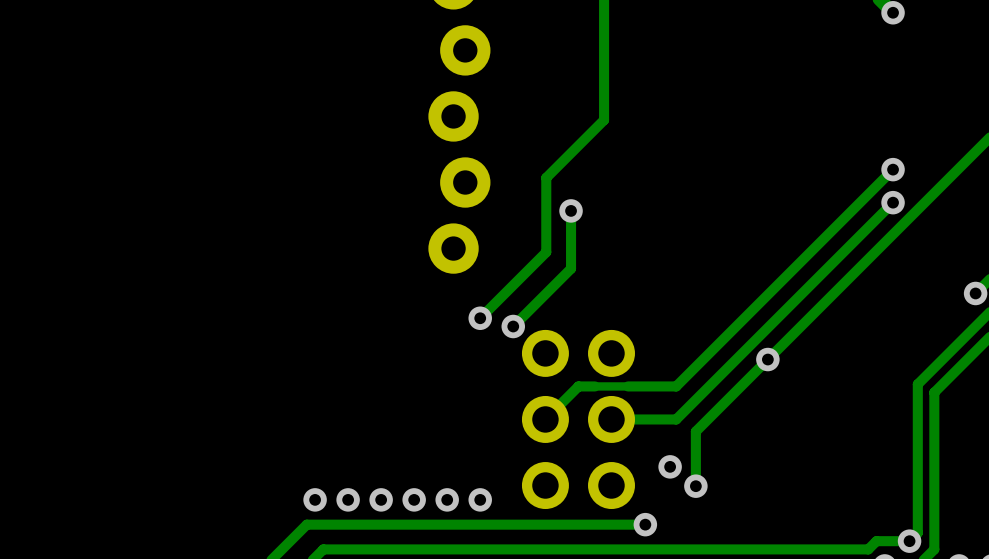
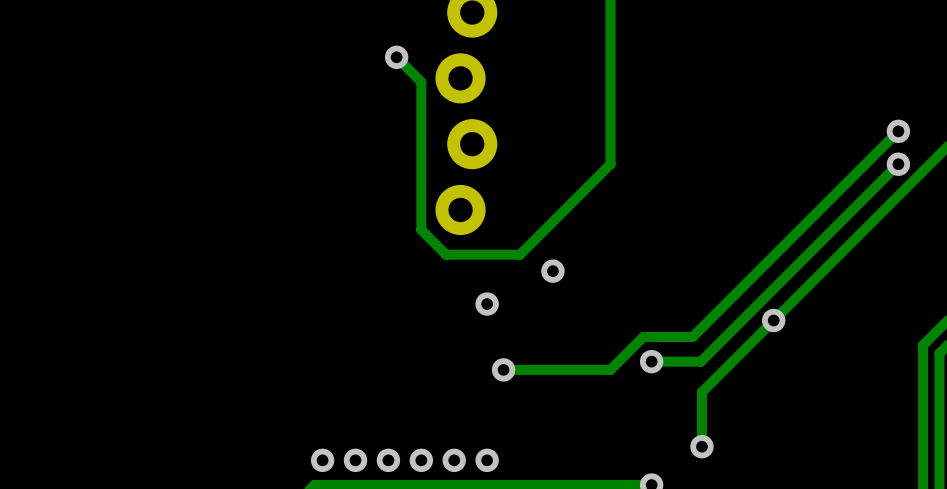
via: none -> (396, 57)
track: (604, 120) (546, 177) (546, 252) (480, 318) -> (610, 81) (610, 164) (520, 254) (445, 254) (421, 230) (421, 81) (396, 57)
track: (571, 210) (571, 268) (513, 326) -> none
via: (571, 210) -> none
via: none -> (552, 271)
via: (480, 318) -> none
via: (513, 326) -> none
via: none -> (487, 304)
track: (686, 376) (676, 386) (578, 386) (545, 419) -> (692, 336) (643, 336) (610, 369) (503, 369)
track: (694, 400) (676, 419) (611, 419) -> (700, 361) (651, 361)
via: none -> (503, 369)
part: (578, 419) -> none
via position: (670, 466) -> (651, 361)

